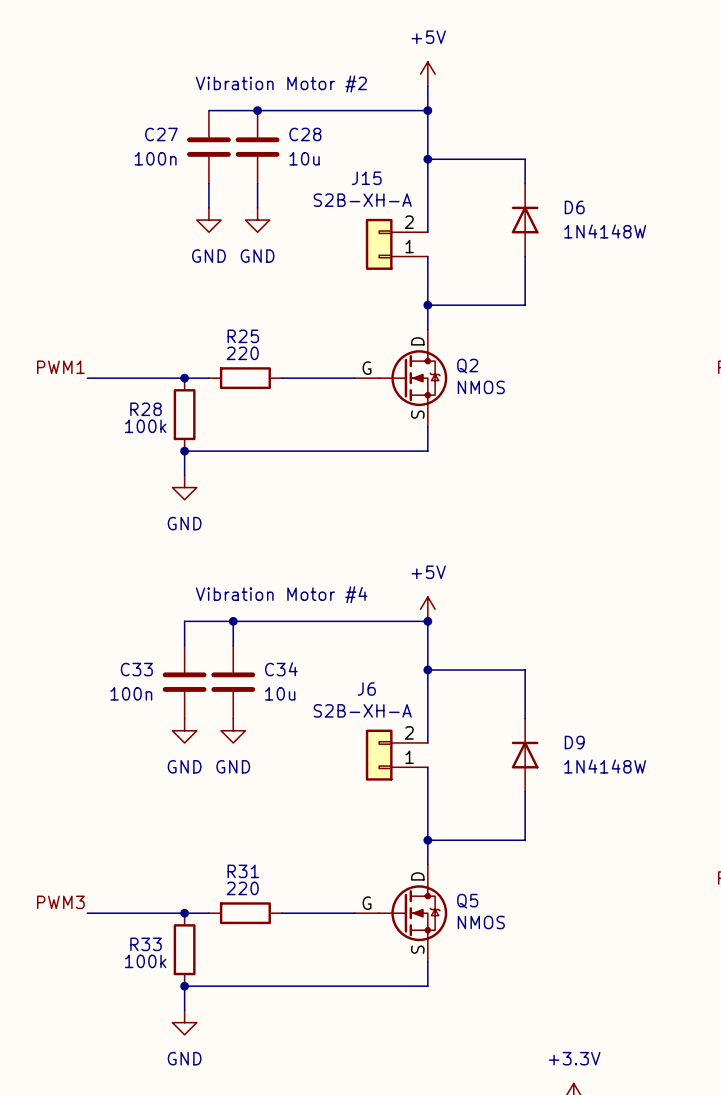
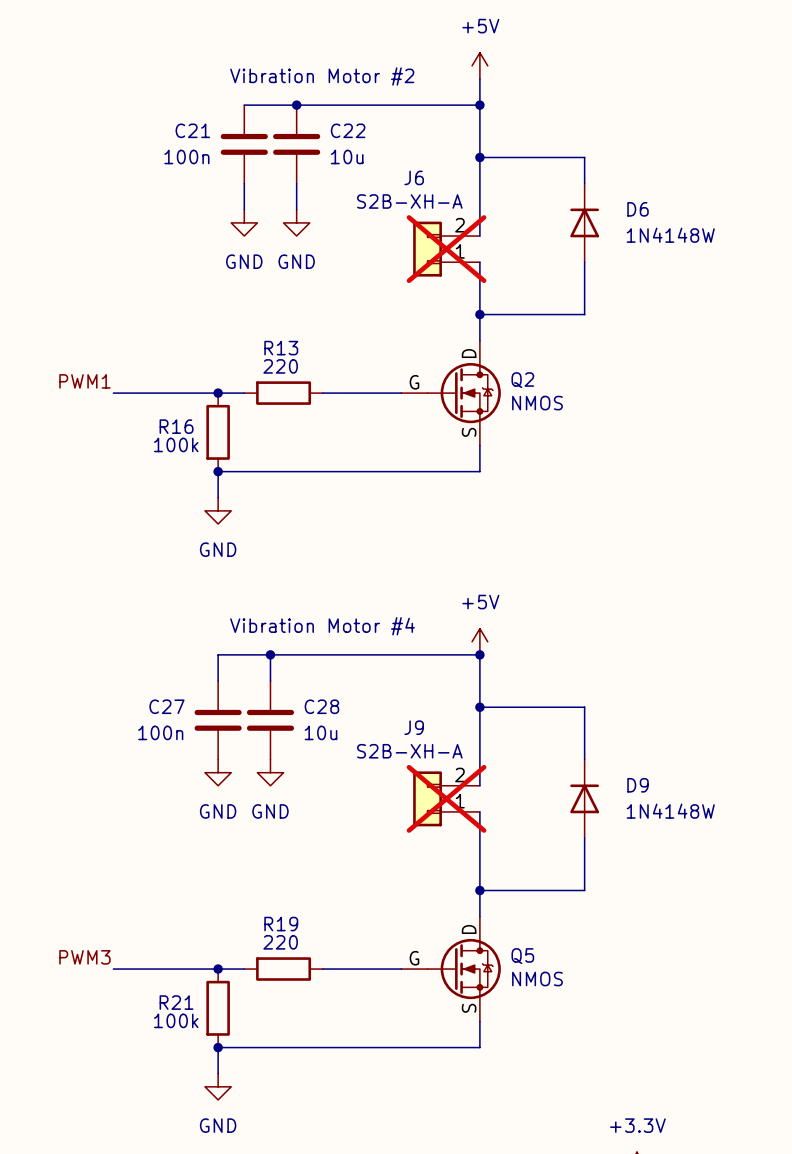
C27 name: C27 (161, 134) -> C21 (192, 130)
C28 name: C28 (305, 134) -> C22 (348, 130)
J15 name: J15 (366, 178) -> J6 (414, 177)
J15 do-not-place cross: none -> (446, 249)
R25 name: R25 (243, 336) -> R13 (281, 348)
R28 name: R28 (145, 409) -> R16 (176, 426)
C33 name: C33 (136, 669) -> C27 (166, 706)
C34 name: C34 (281, 669) -> C28 (321, 706)
J6 name: J6 (366, 689) -> J9 (414, 727)
J6 do-not-place cross: none -> (446, 798)
R31 name: R31 (243, 871) -> R19 (281, 924)
R33 name: R33 (145, 944) -> R21 (176, 1002)

